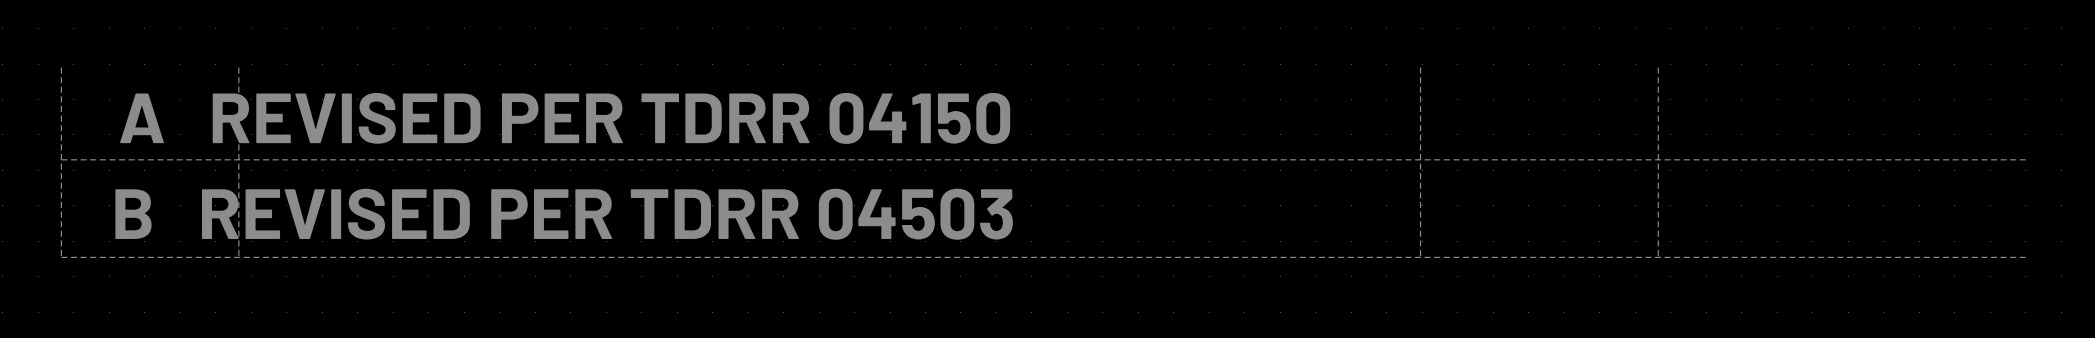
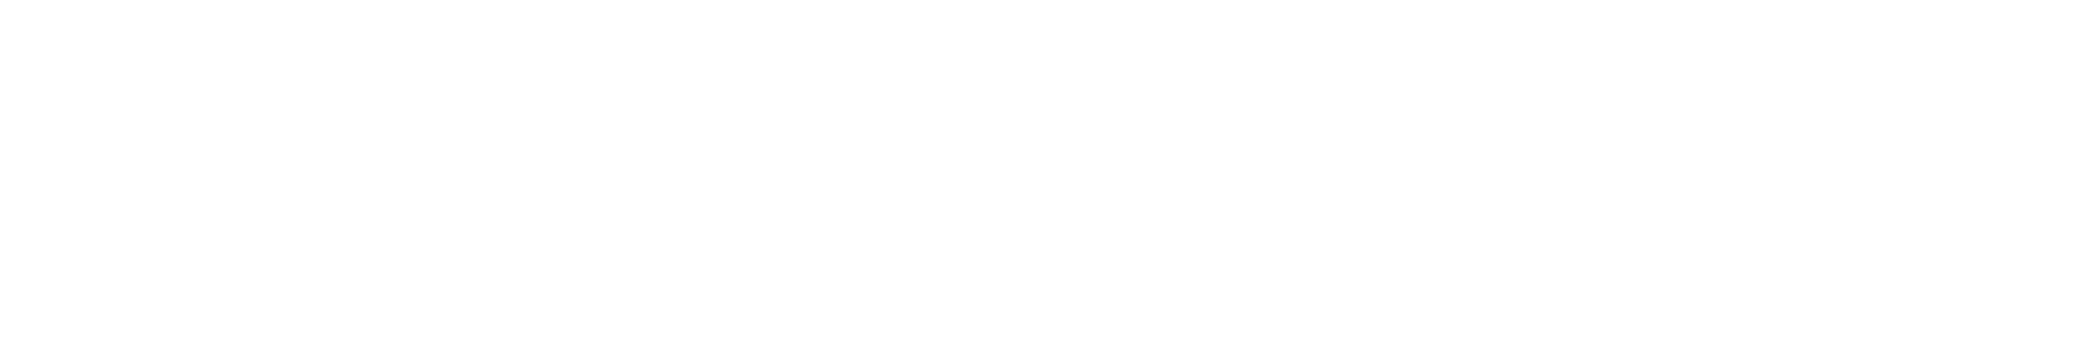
line: (61, 67) (61, 257) (2025, 257) -> none
line: (238, 67) (238, 257) -> none
line: (1420, 67) (1420, 257) -> none
line: (1658, 67) (1658, 257) -> none
text: A REVISED PER TDRR 04150 (565, 118) -> none
line: (61, 159) (2025, 159) -> none
text: B REVISED PER TDRR 04503 (564, 214) -> none

